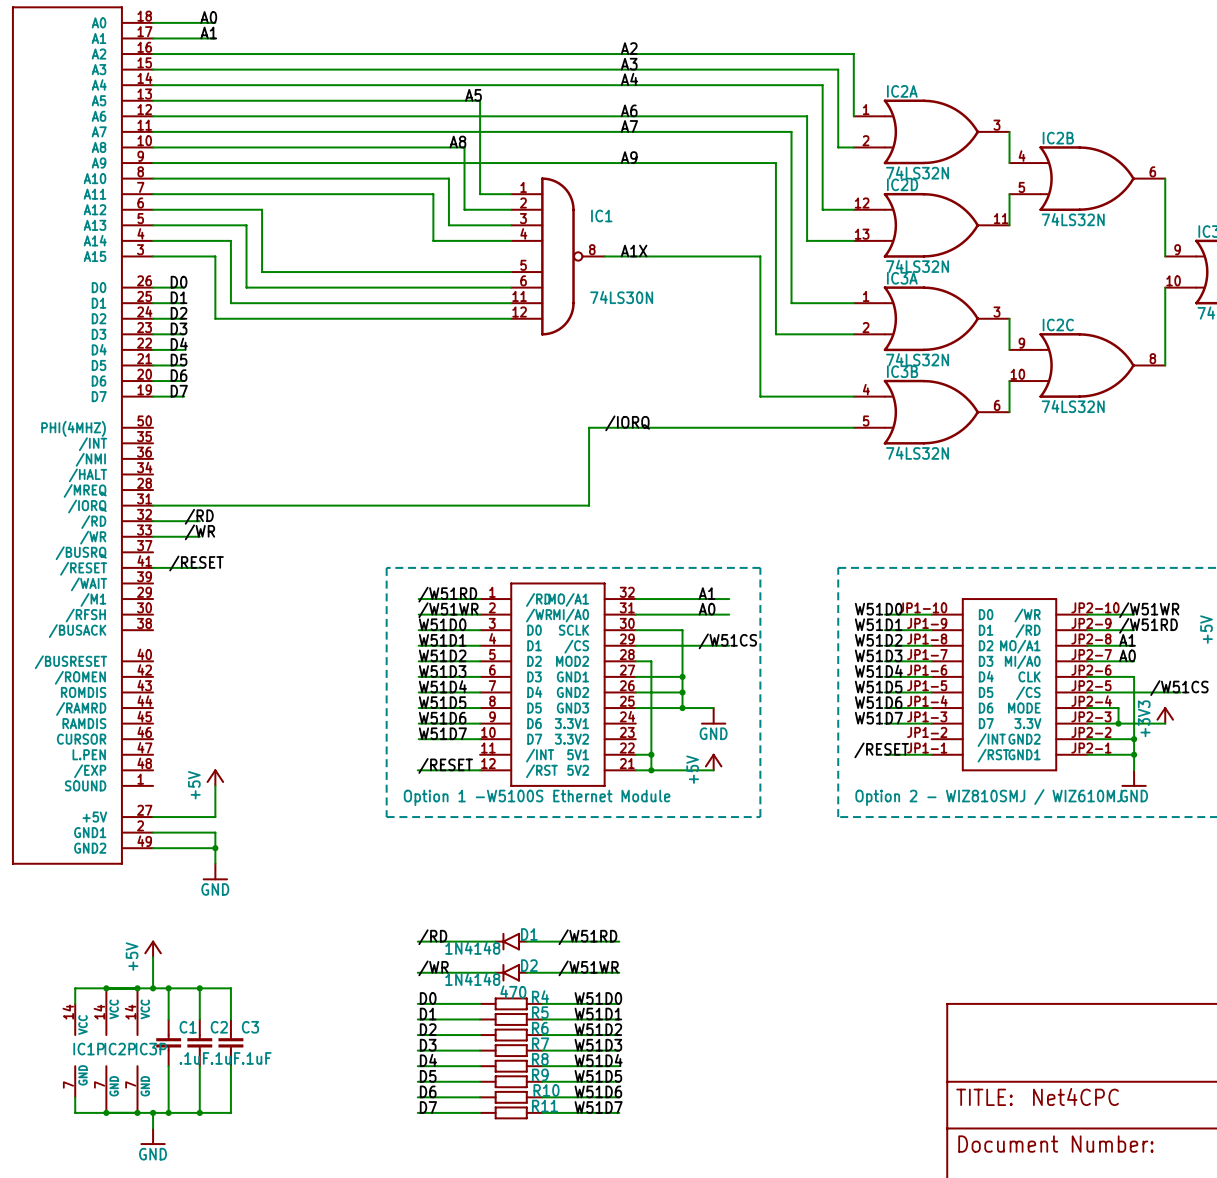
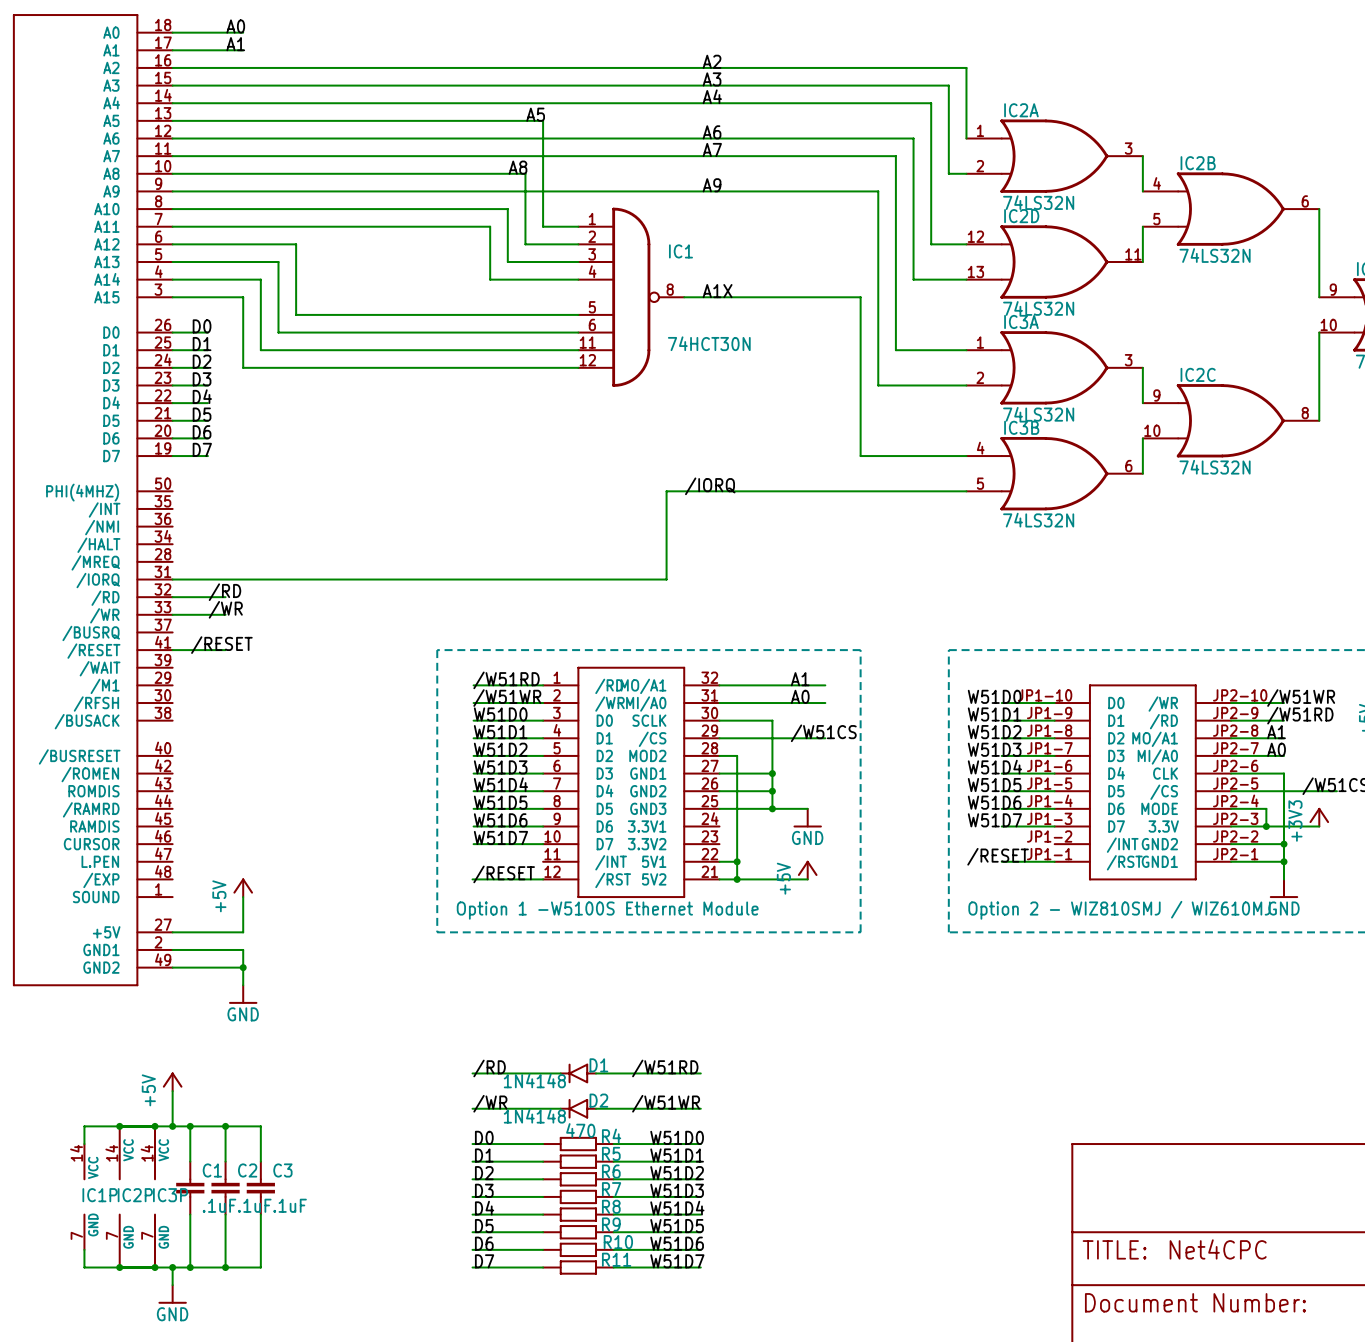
IC1 value: 74LS30N (621, 297) -> 74HCT30N (709, 343)

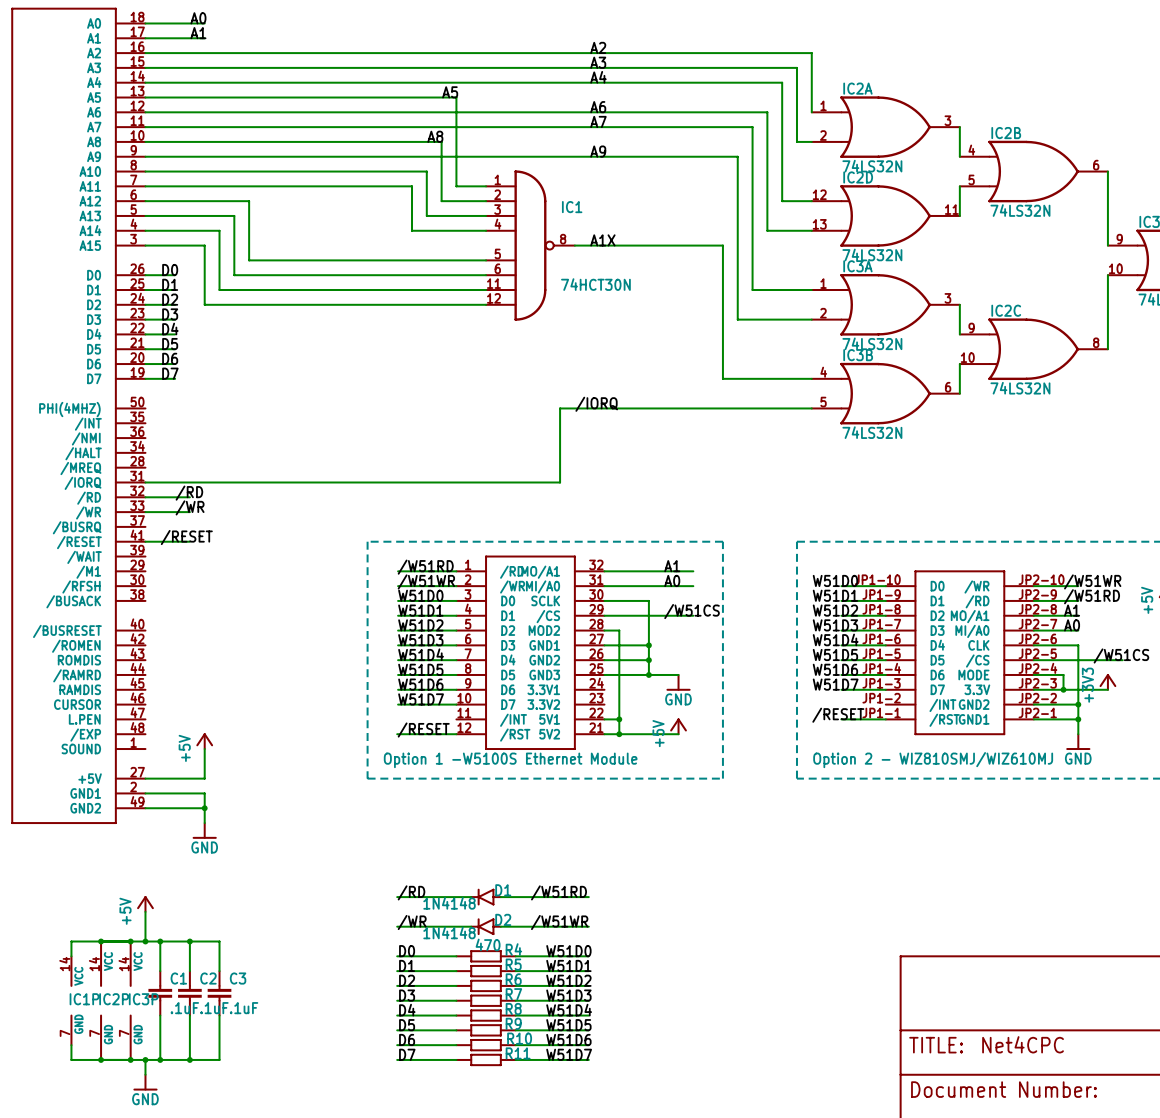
text: Option 2 - WIZ810SMJ / WIZ610MJ (1119, 910) -> Option 2 - WIZ810SMJ/WIZ610MJ (933, 760)

